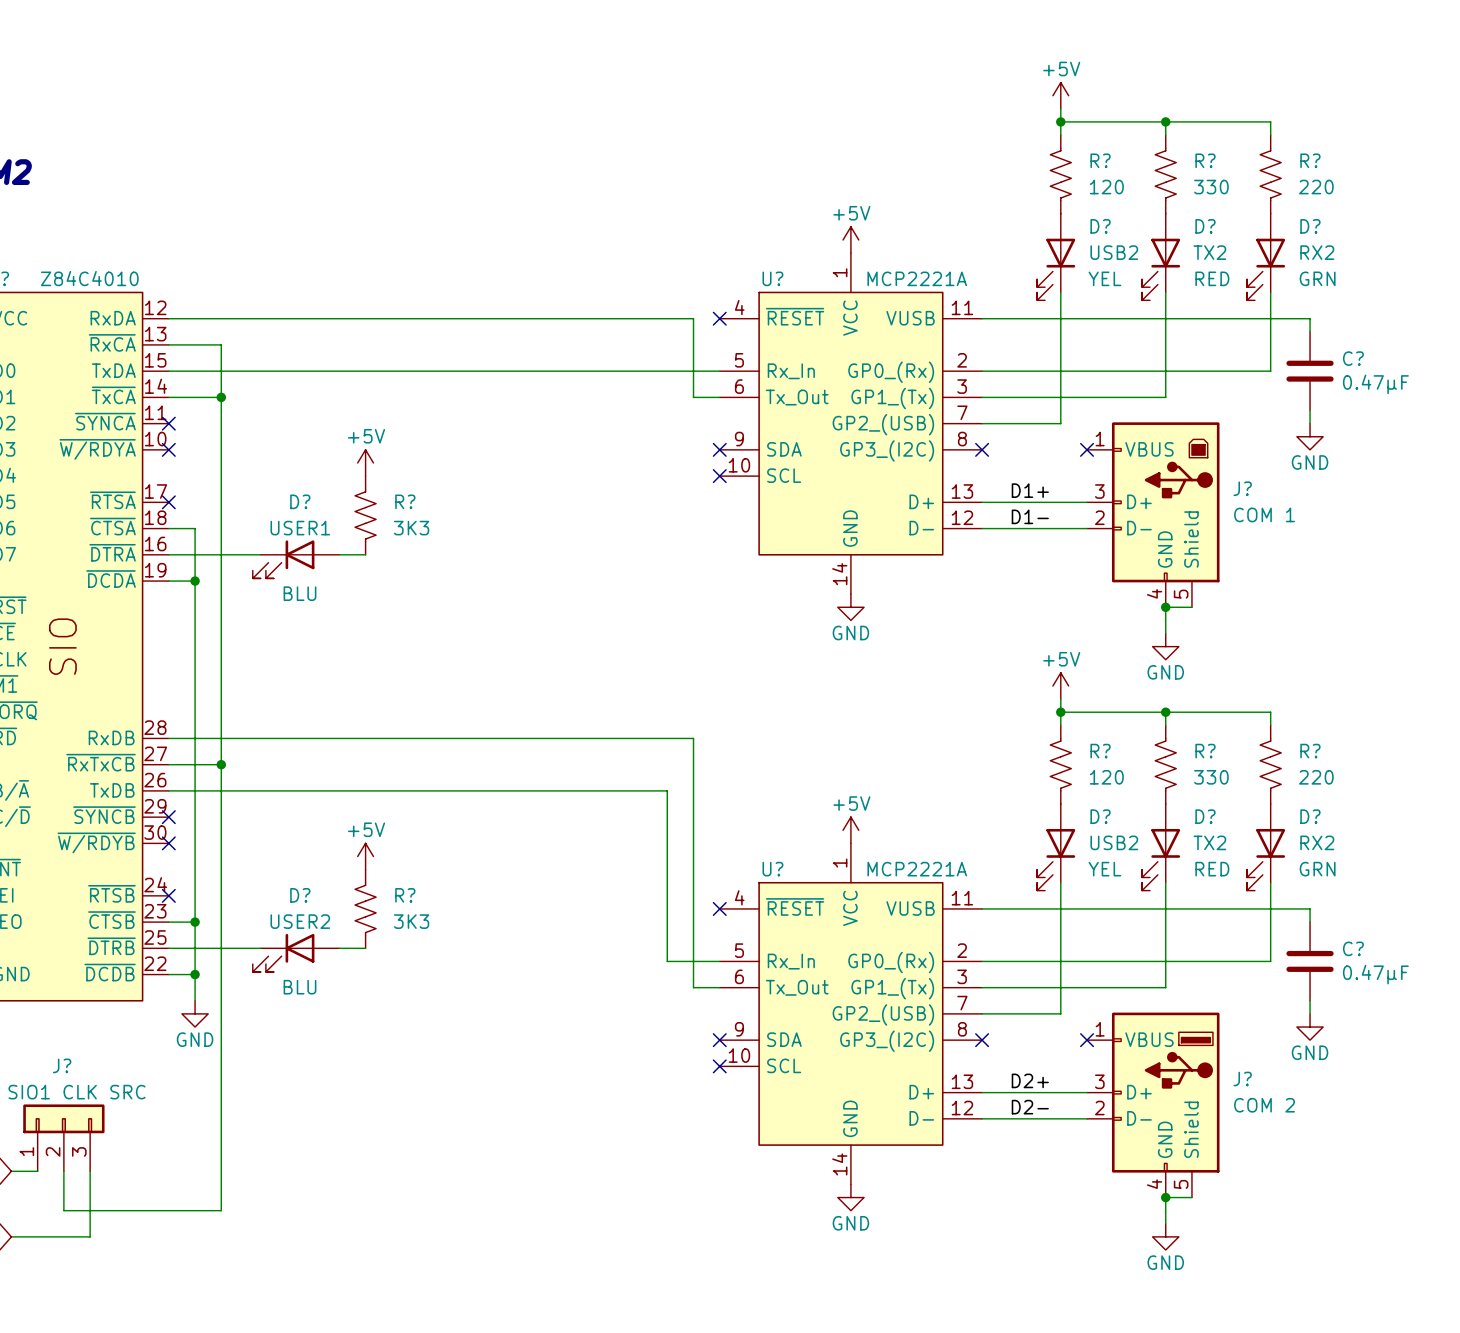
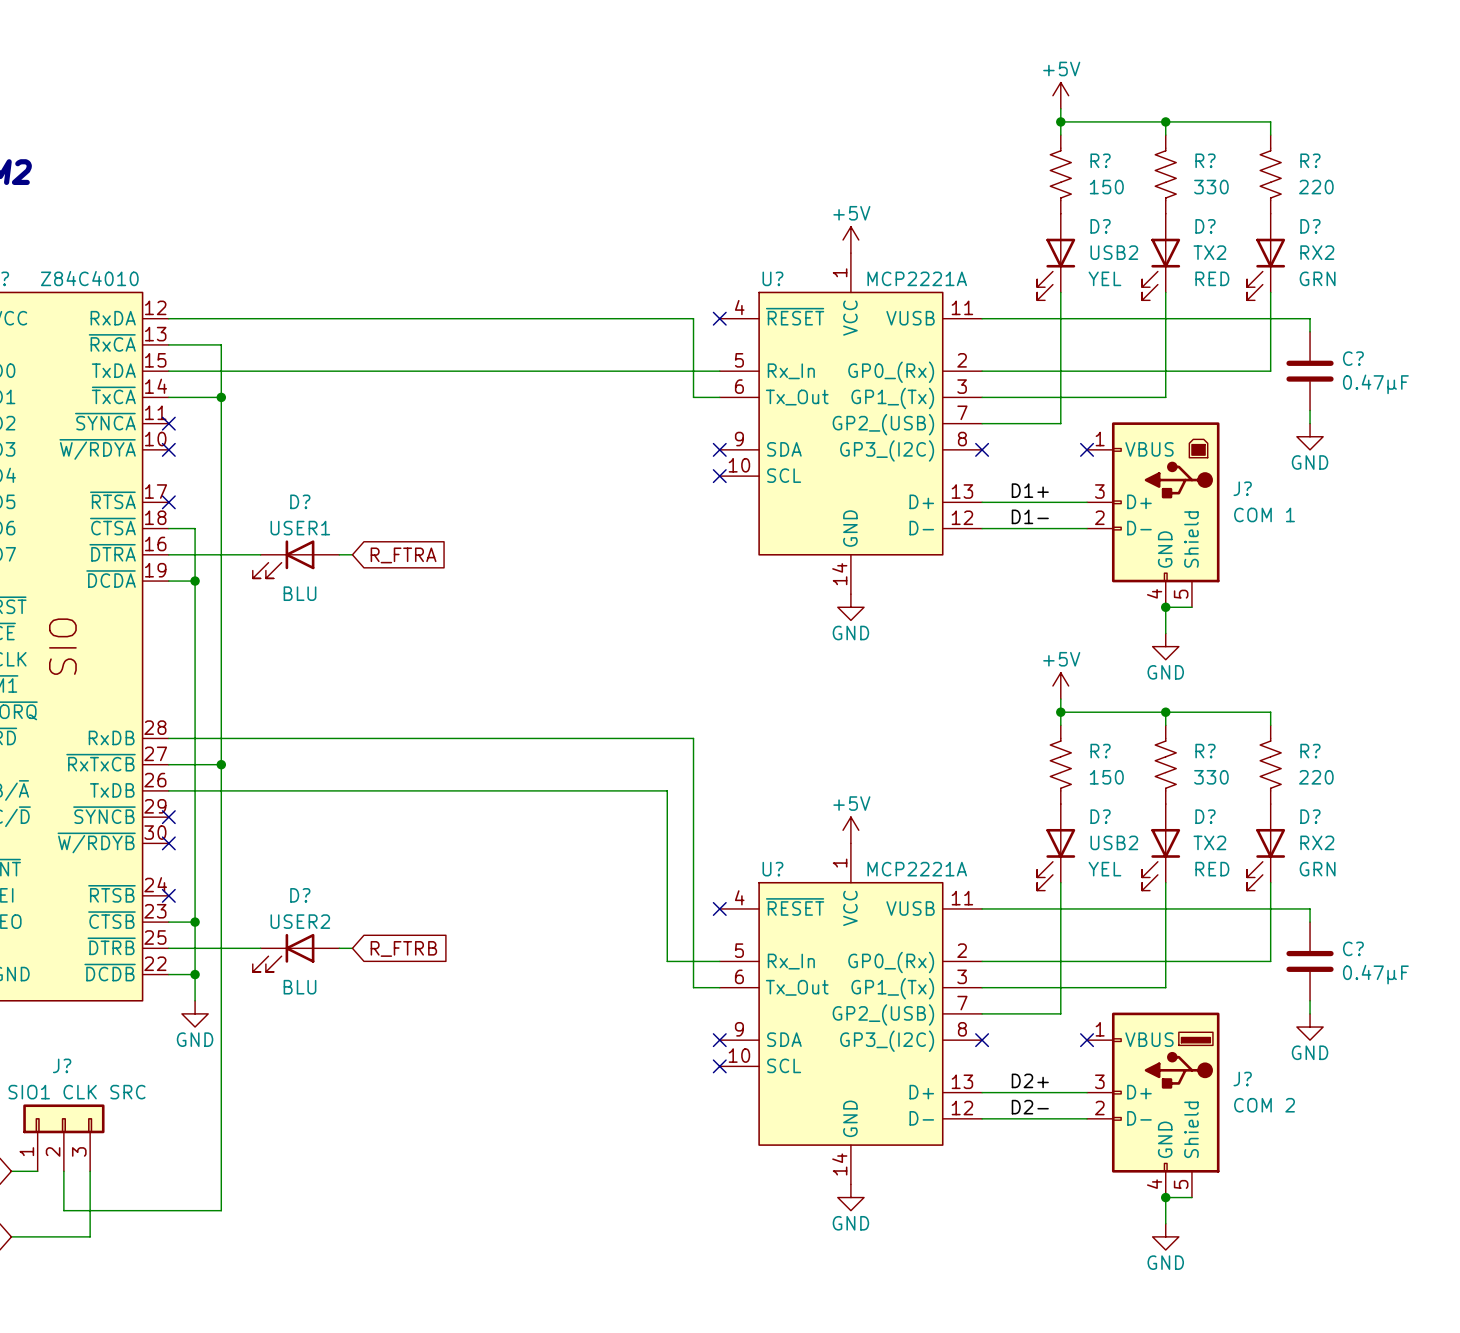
R? value: 120 (1106, 187) -> 150 (1106, 187)
power symbol: +5V (365, 462) -> none
R?: 3K3 (365, 515) -> none
wire: (352, 554) (365, 554) -> none
global label: none -> R_FTRA (403, 555)
R? value: 120 (1106, 777) -> 150 (1106, 777)
power symbol: +5V (365, 856) -> none
R?: 3K3 (365, 908) -> none
wire: (352, 948) (365, 948) -> none
global label: none -> R_FTRB (403, 948)

